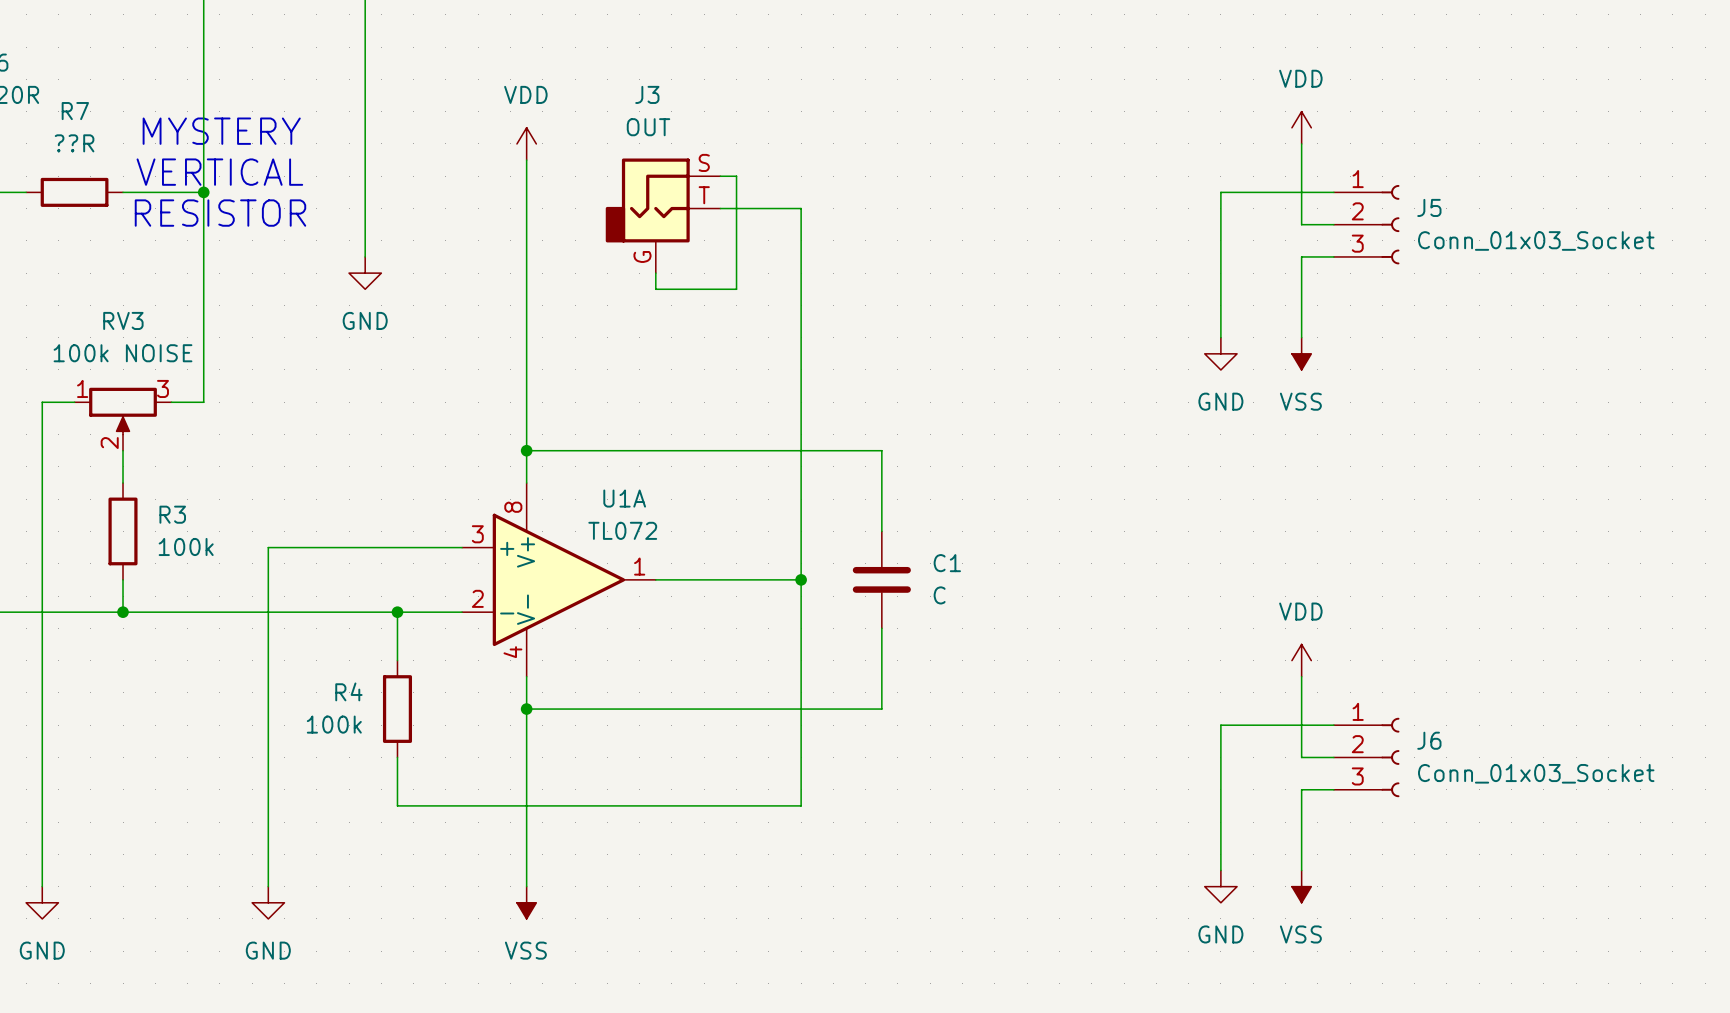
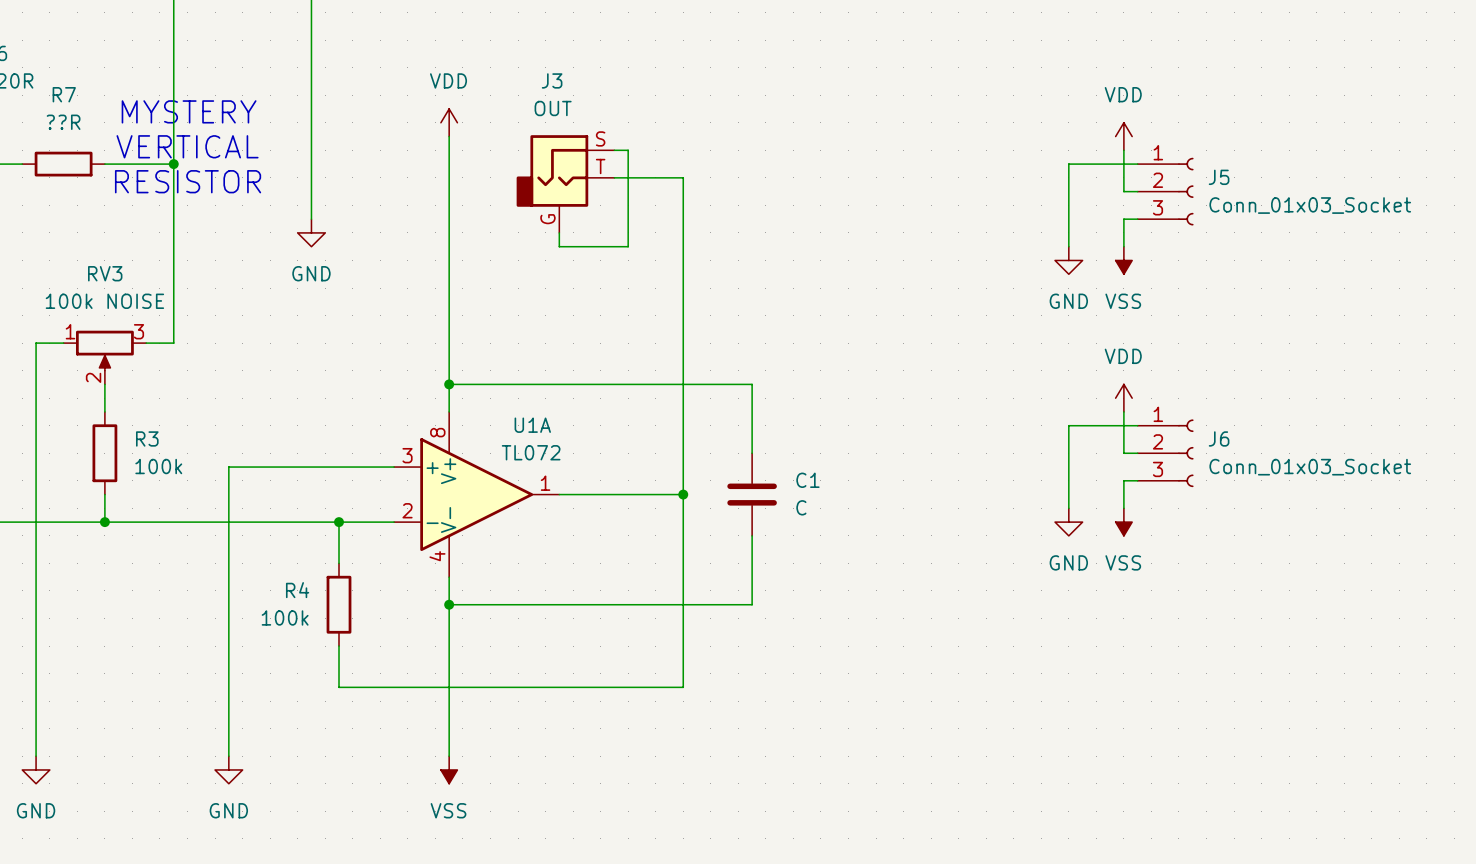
power symbol position: VDD (1301, 127) -> VDD (1123, 136)
wire: (1301, 143) (1301, 224) (1317, 224) -> (1123, 150) (1123, 191)
wire: (1253, 192) (1220, 192) (1220, 337) -> (1068, 164) (1068, 246)
wire: (1317, 256) (1301, 256) (1301, 337) -> (1123, 219) (1123, 246)
power symbol position: GND (1220, 353) -> GND (1068, 260)
power symbol position: VSS (1301, 353) -> VSS (1123, 260)
power symbol: none -> VDD (1123, 398)
wire: none -> (1123, 411) (1123, 453) (1137, 453)
wire: none -> (1137, 425) (1068, 425) (1068, 508)
wire: none -> (1137, 480) (1123, 480) (1123, 508)
power symbol: none -> GND (1068, 522)
power symbol: none -> VSS (1123, 522)
power symbol: VDD (1301, 660) -> none
wire: (1301, 676) (1301, 757) (1333, 757) -> none
wire: (1333, 725) (1220, 725) (1220, 870) -> none
J6 position: (1366, 757) -> (1165, 453)
wire: (1333, 789) (1301, 789) (1301, 870) -> none
power symbol: GND (1220, 886) -> none
power symbol: VSS (1301, 886) -> none

